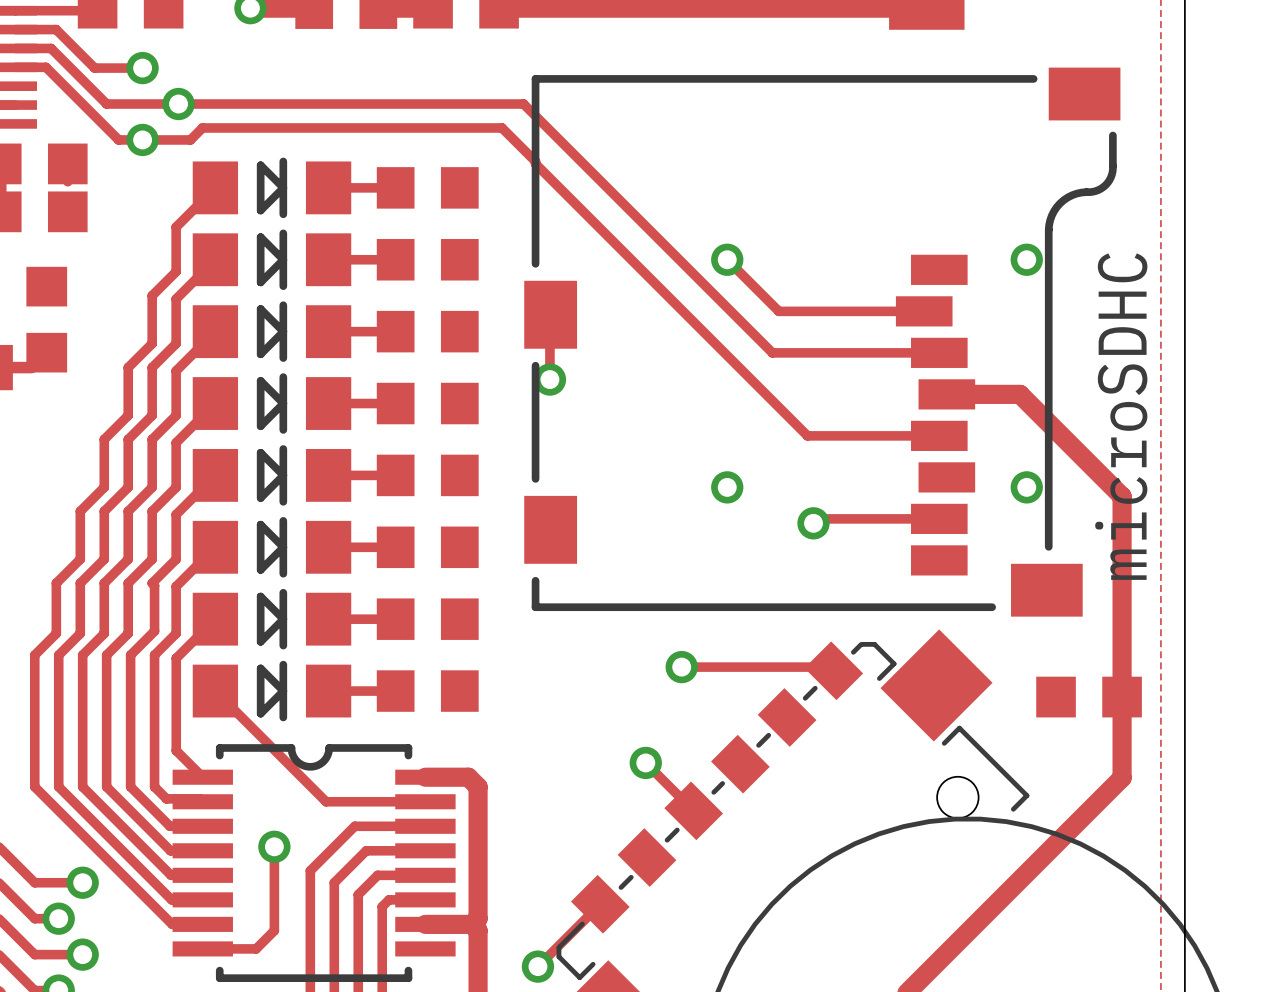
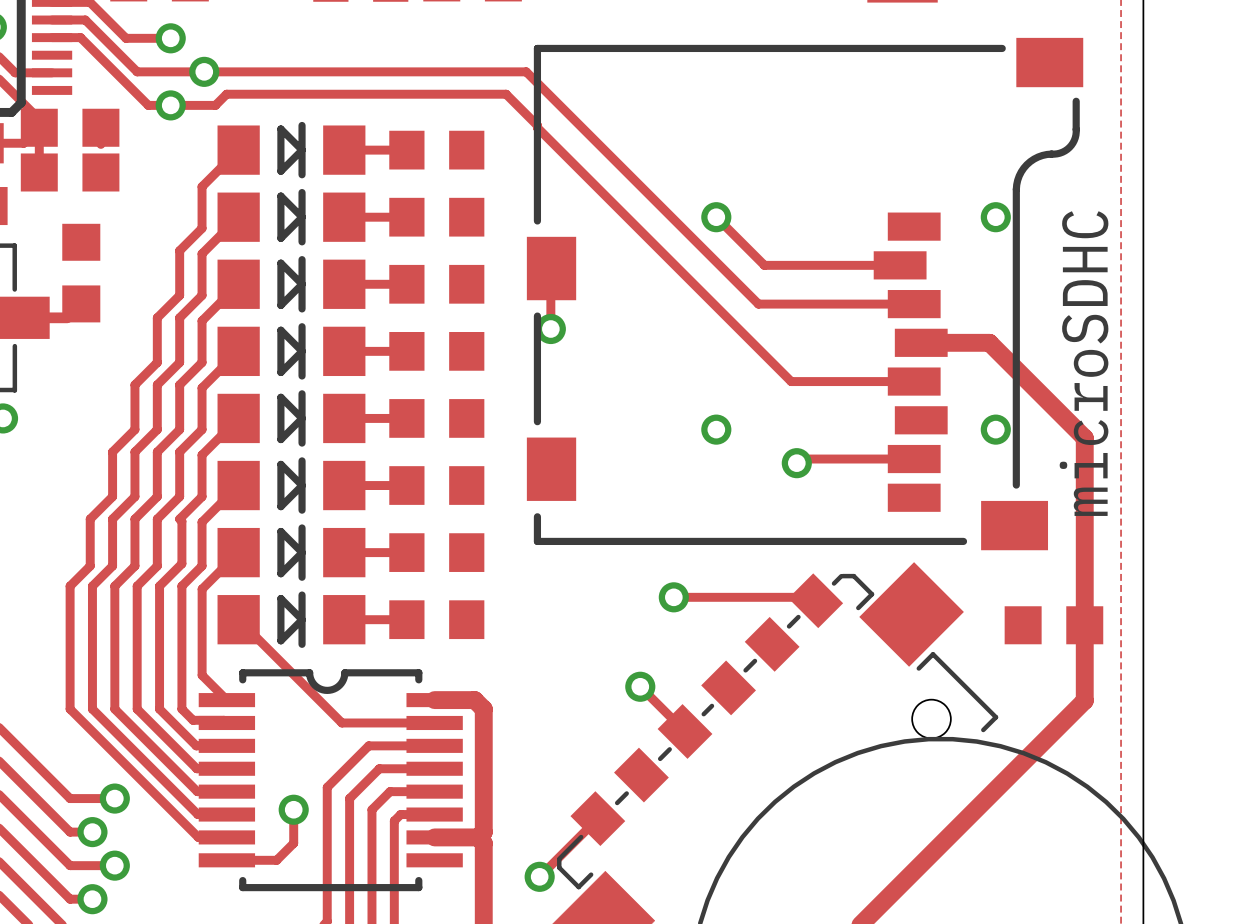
track: (274, 846) (274, 894) -> none
via position: (274, 846) -> (293, 809)

